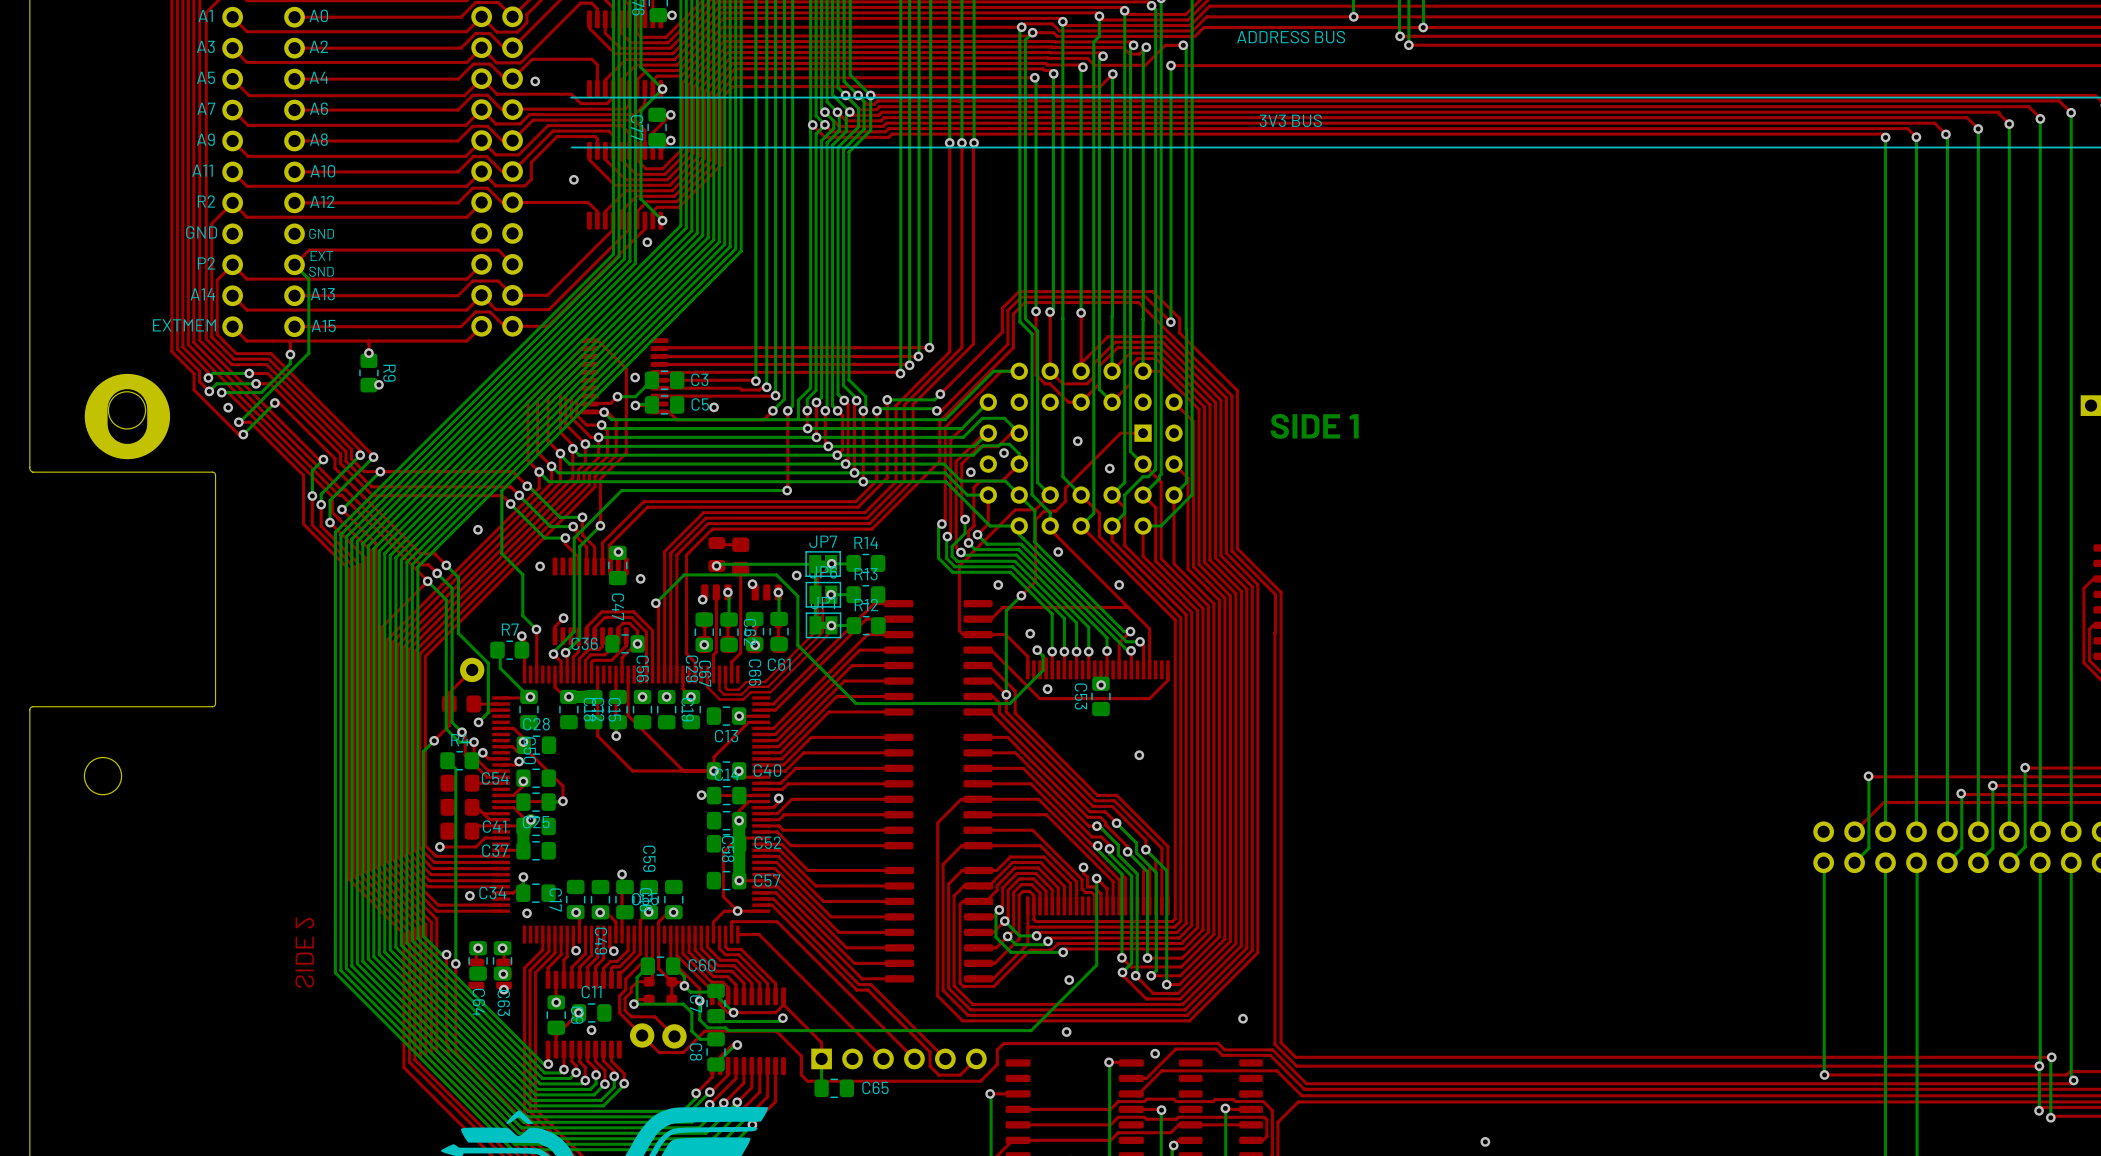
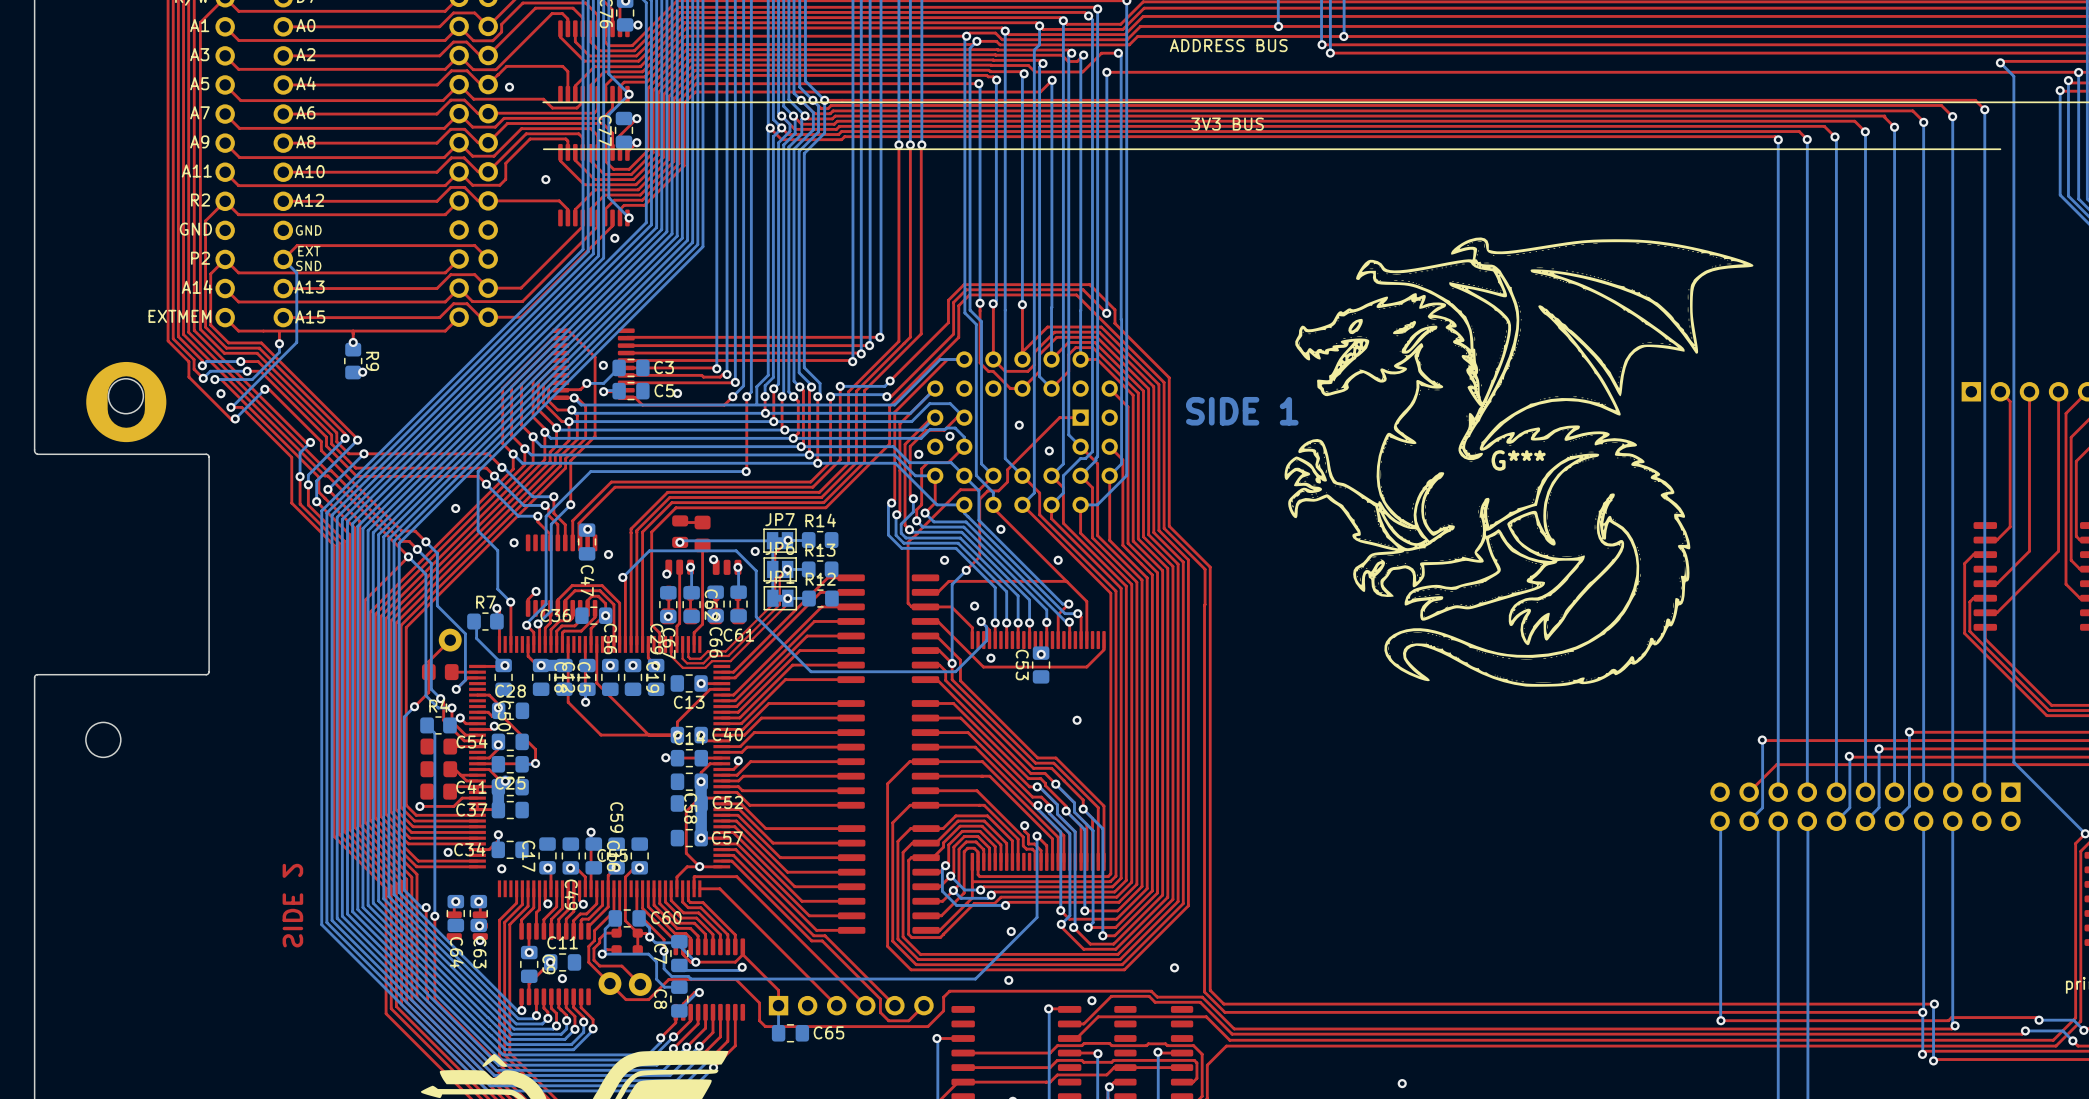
G***: none -> (1519, 462)

